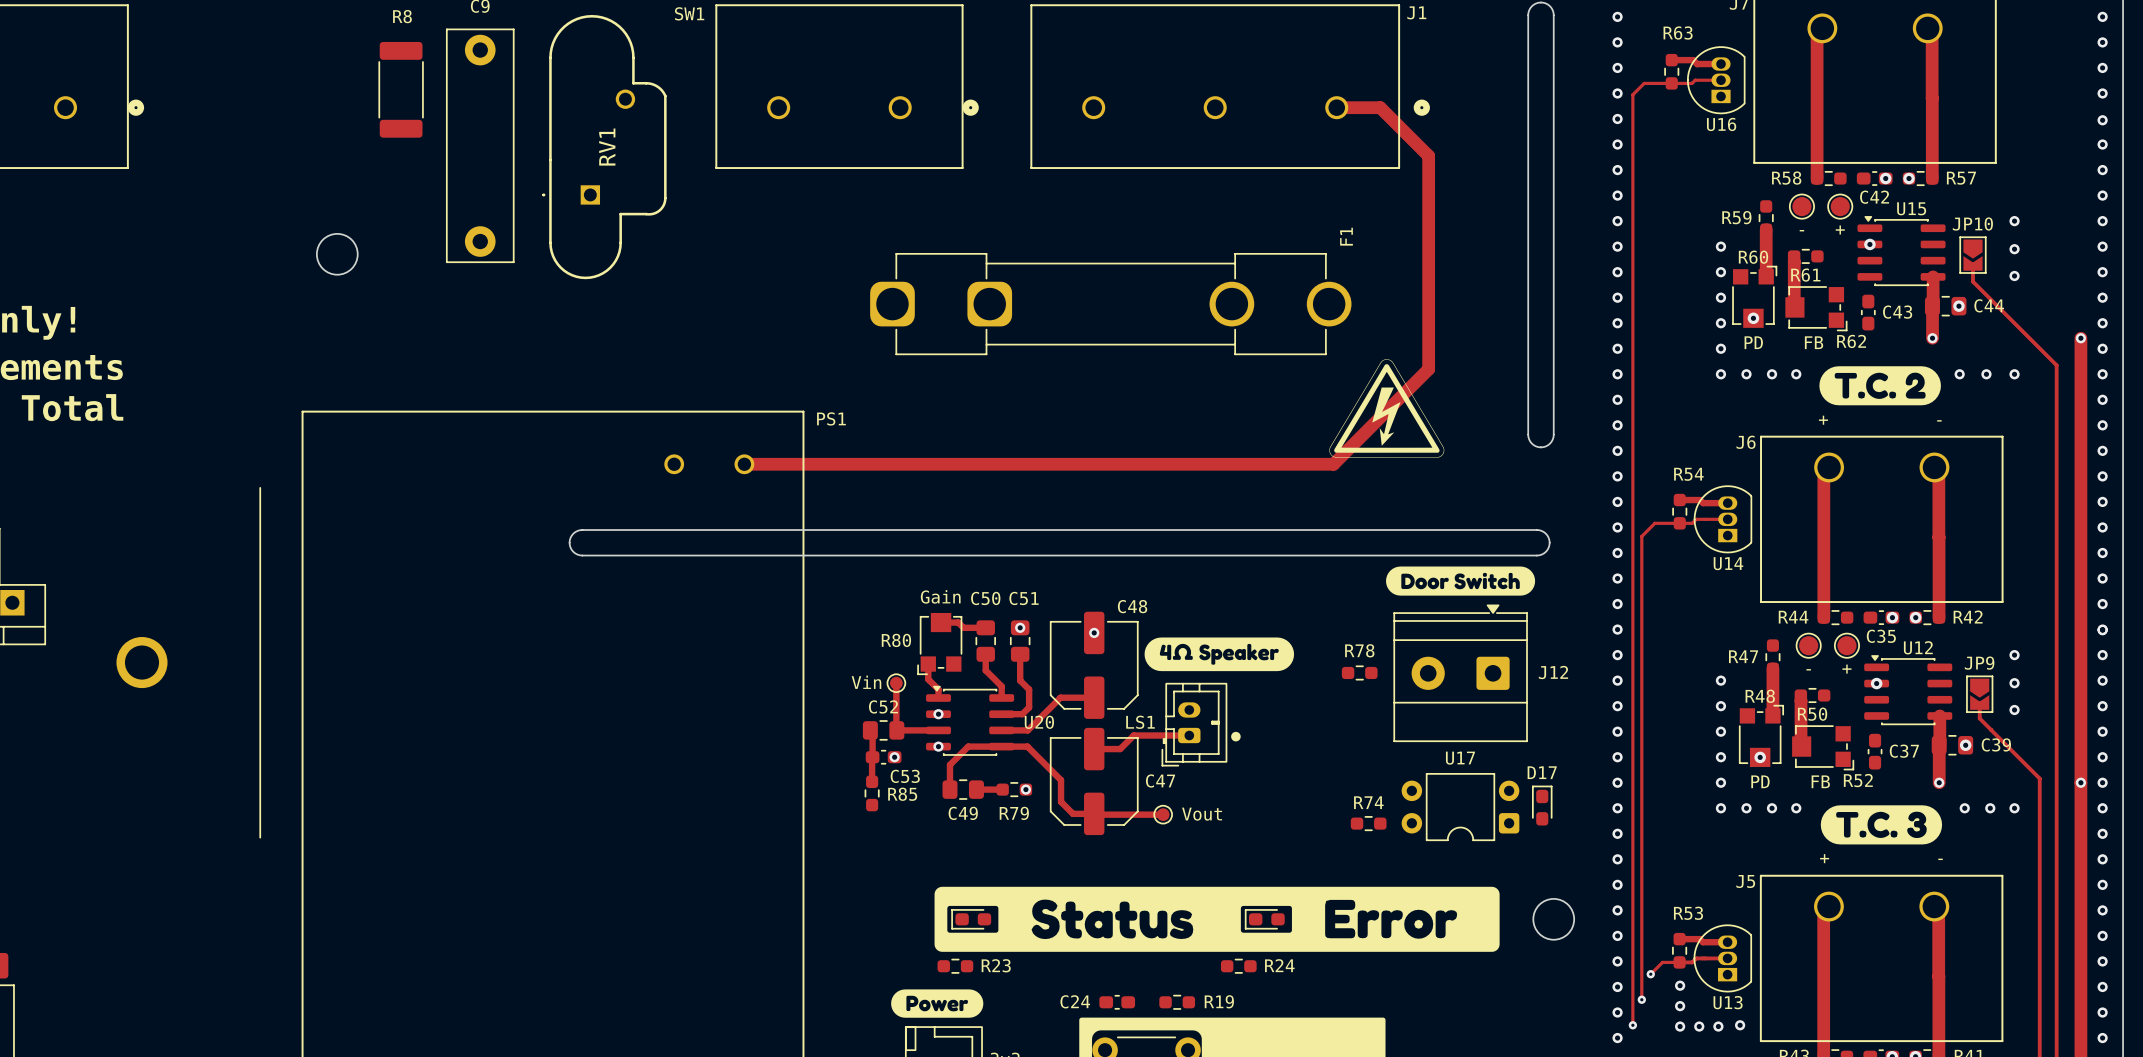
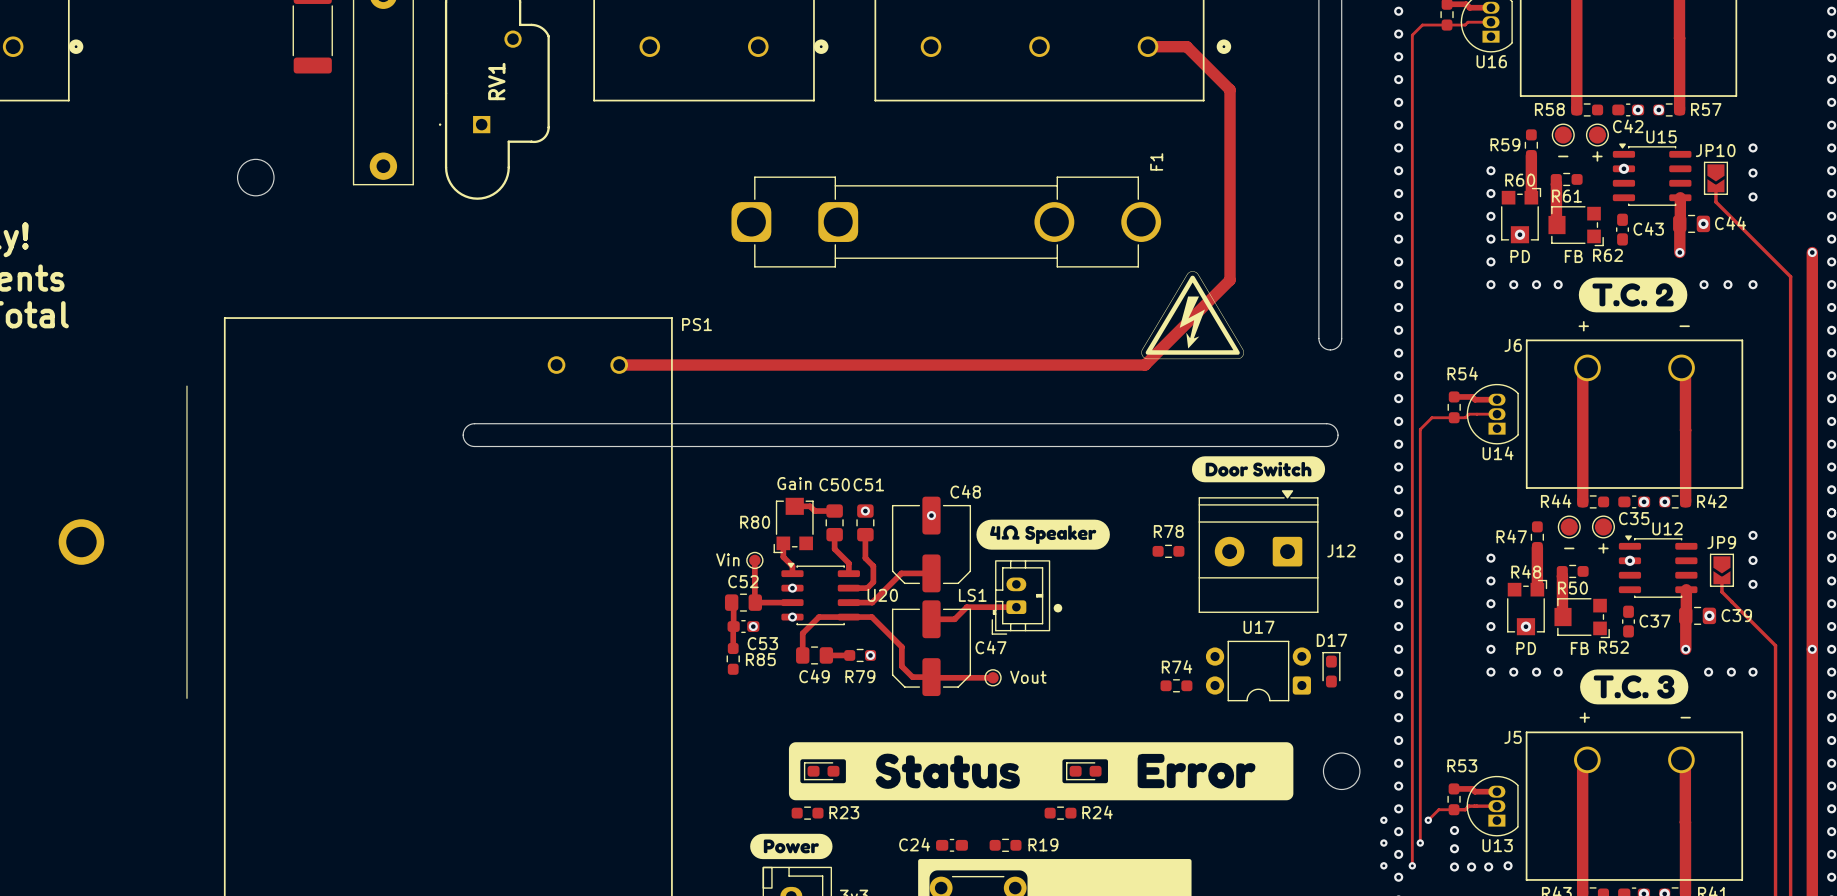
via: none -> (1383, 820)
via: none -> (1383, 843)
via: none -> (1383, 865)

